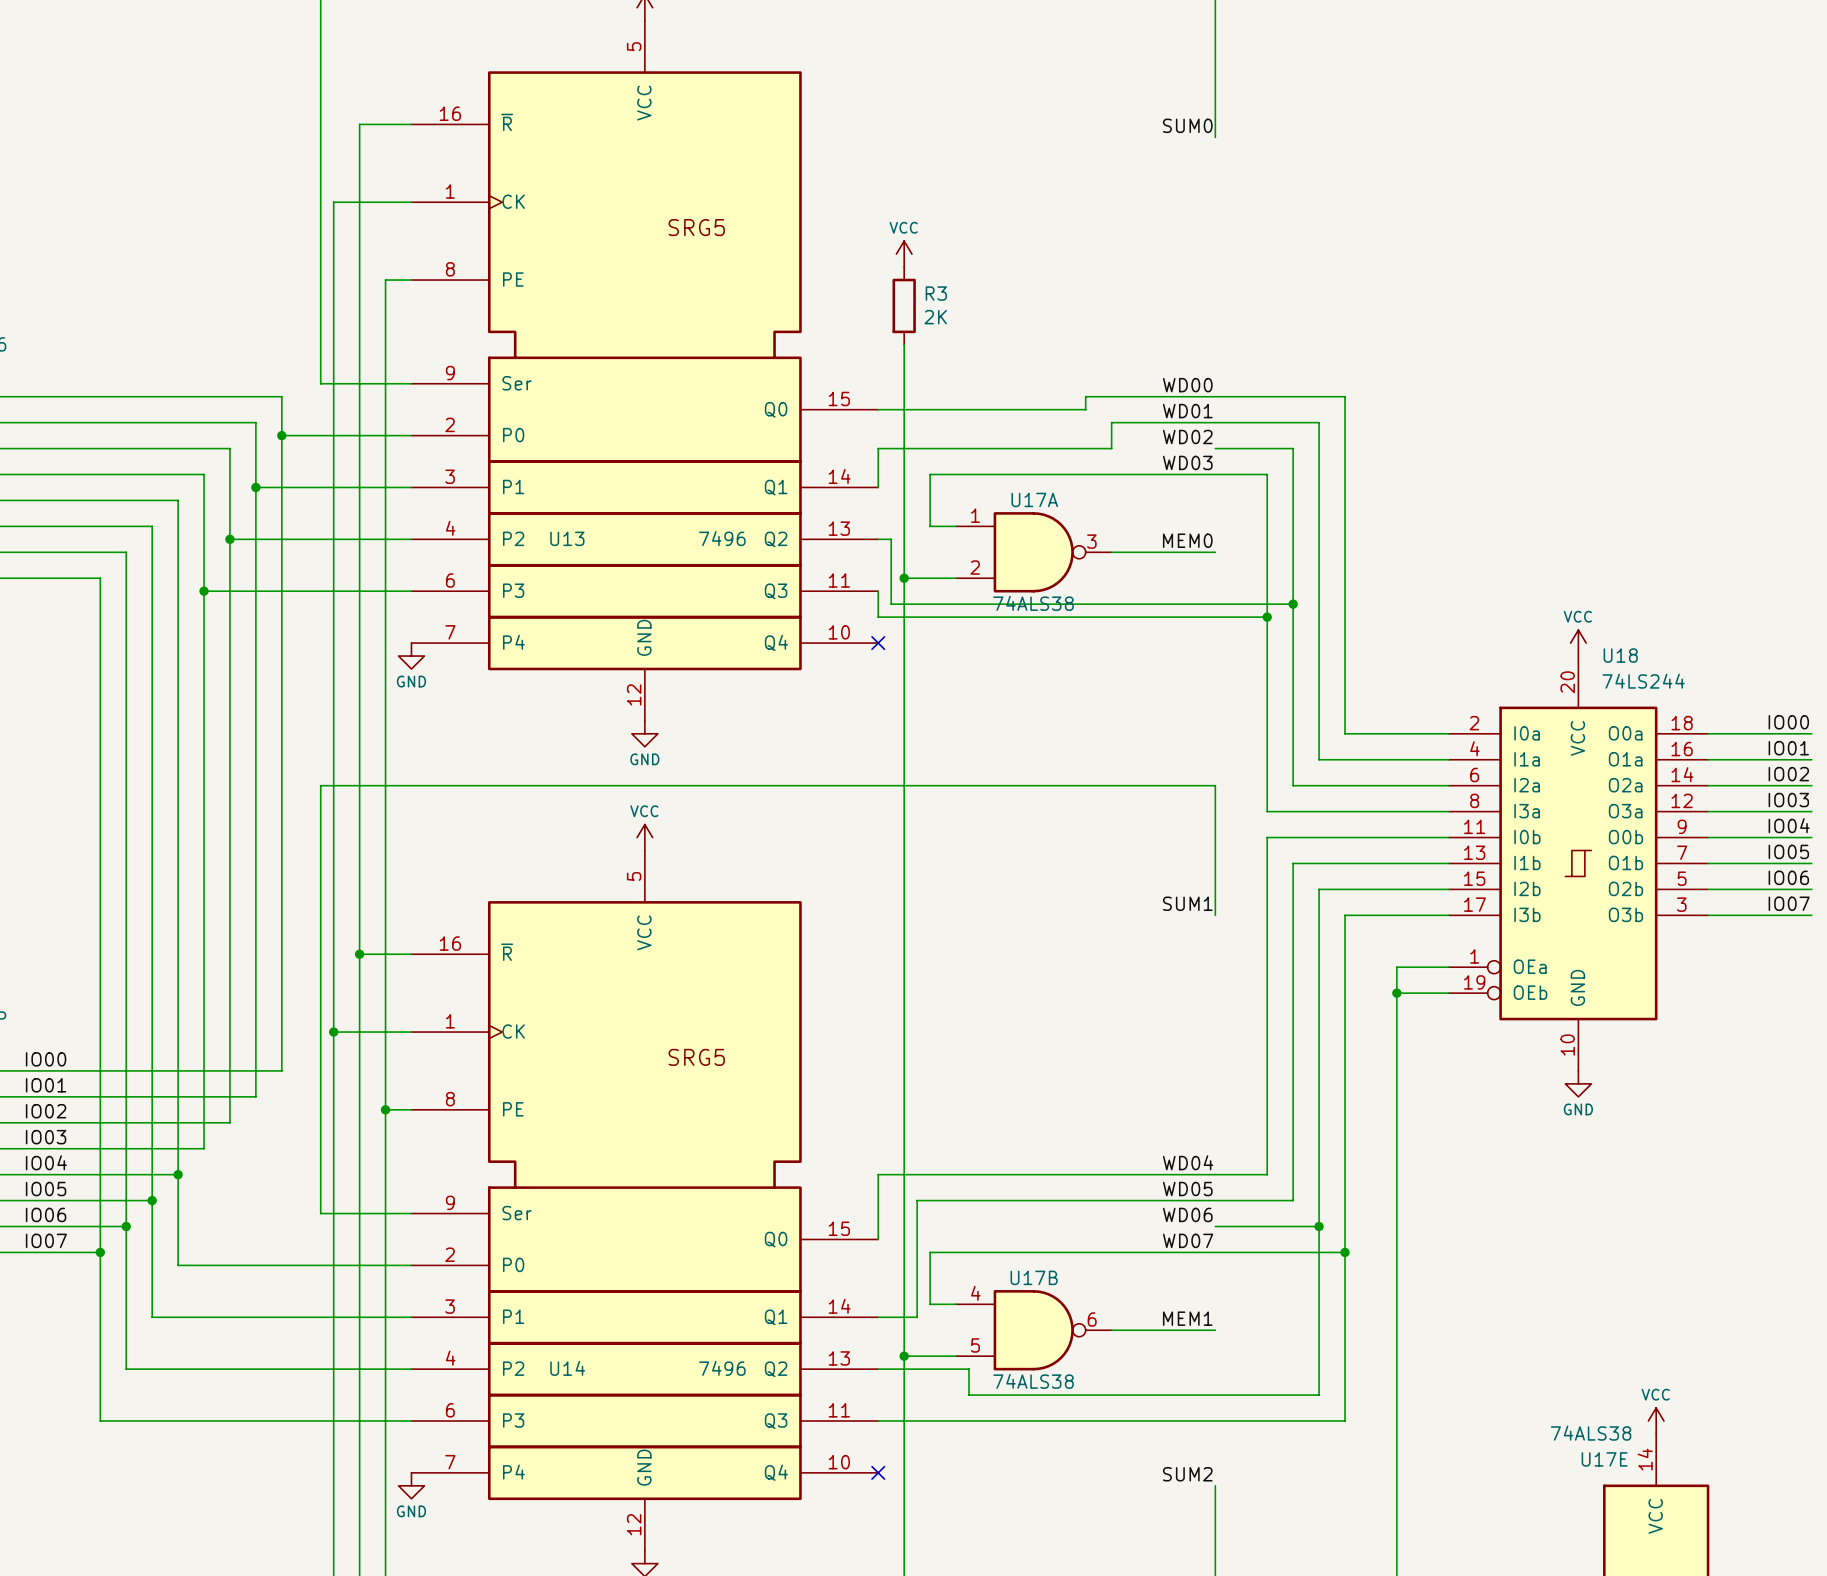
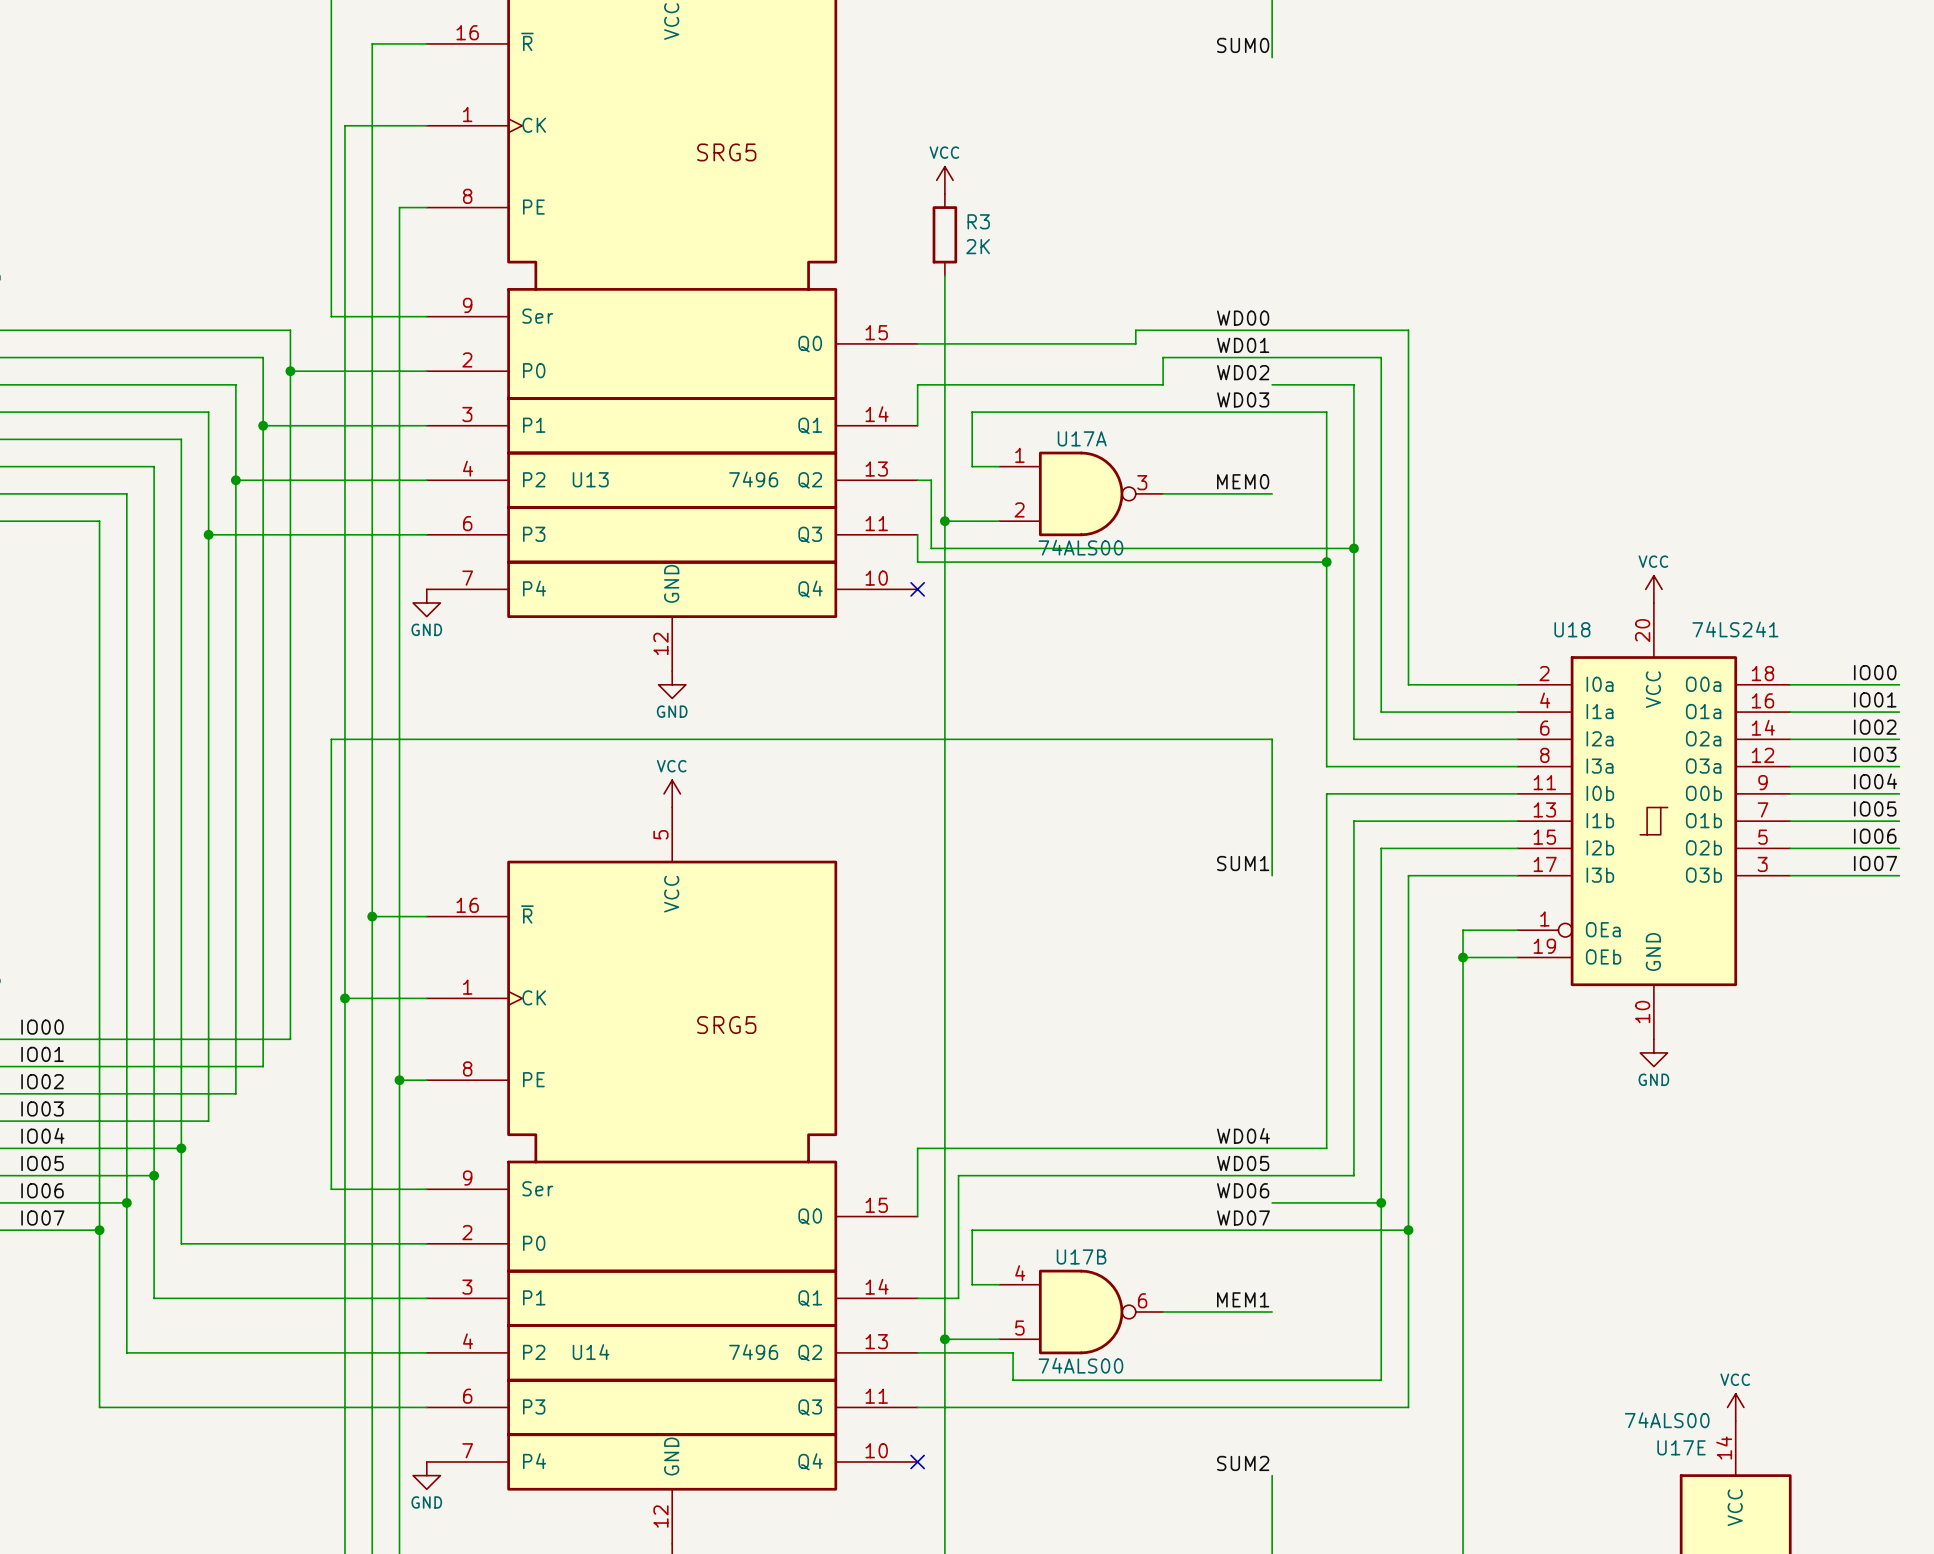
U17A value: 74ALS38 (1033, 603) -> 74ALS00 (1080, 547)
U18 name position: U18 (1620, 655) -> U18 (1572, 629)
U18 symbol: [1448, 656, 1709, 1071] -> [1517, 602, 1791, 1040]
U18 value: 74LS244 (1643, 681) -> 74LS241 (1735, 629)
U17B value: 74ALS38 (1033, 1381) -> 74ALS00 (1080, 1365)
U17E value: 74ALS38 (1591, 1433) -> 74ALS00 (1667, 1420)

